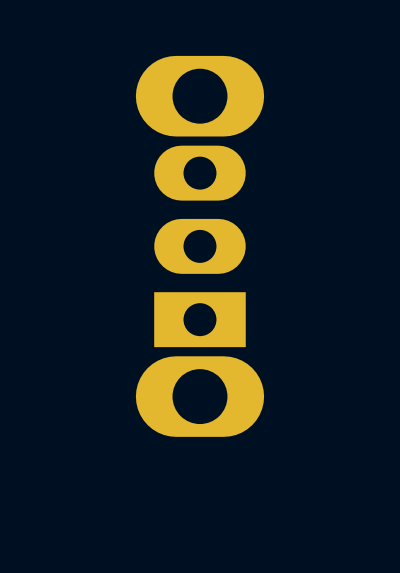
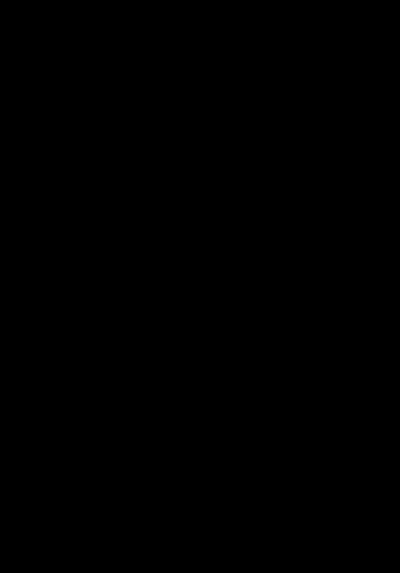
part: (199, 246) -> none

